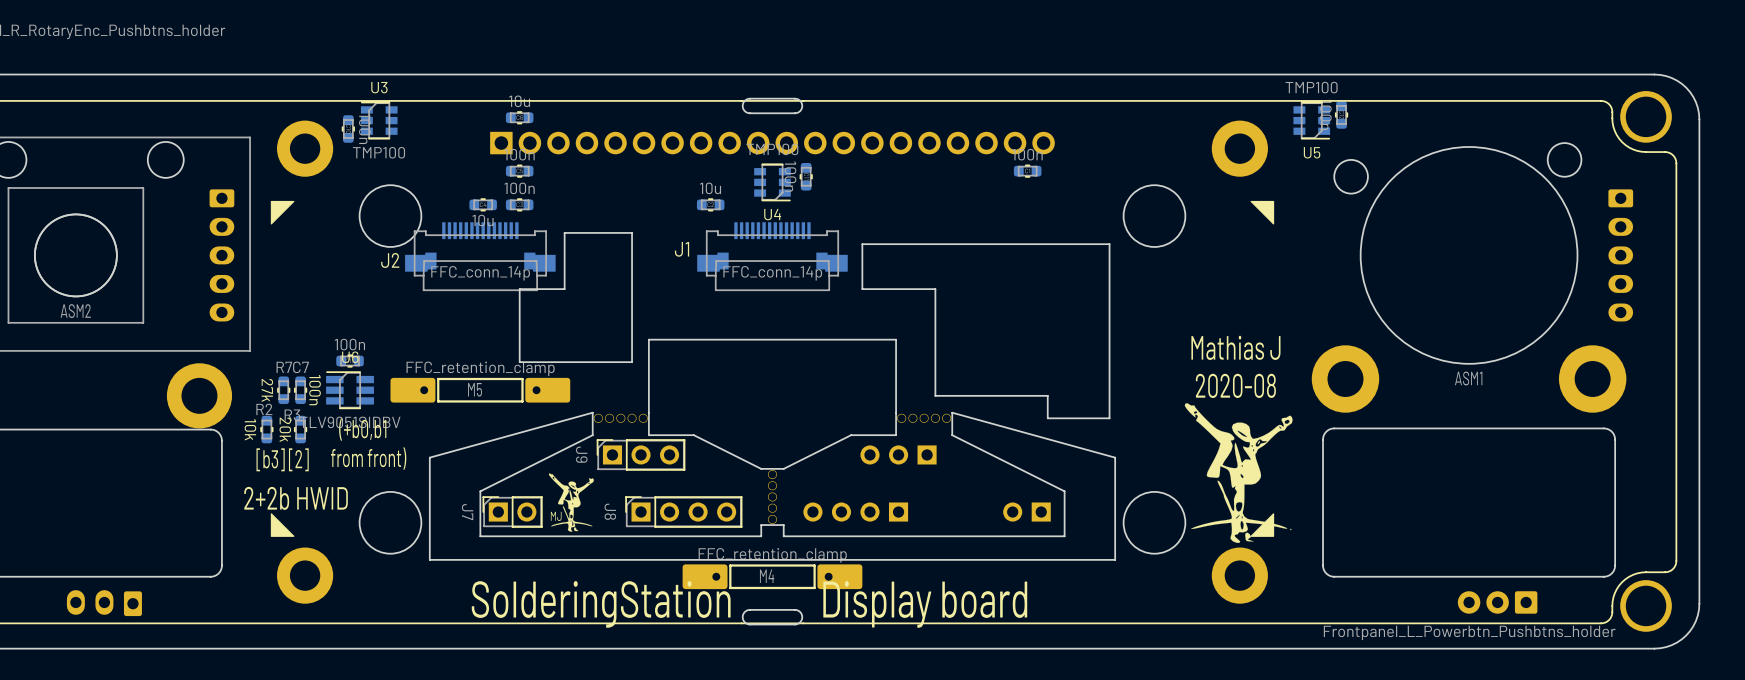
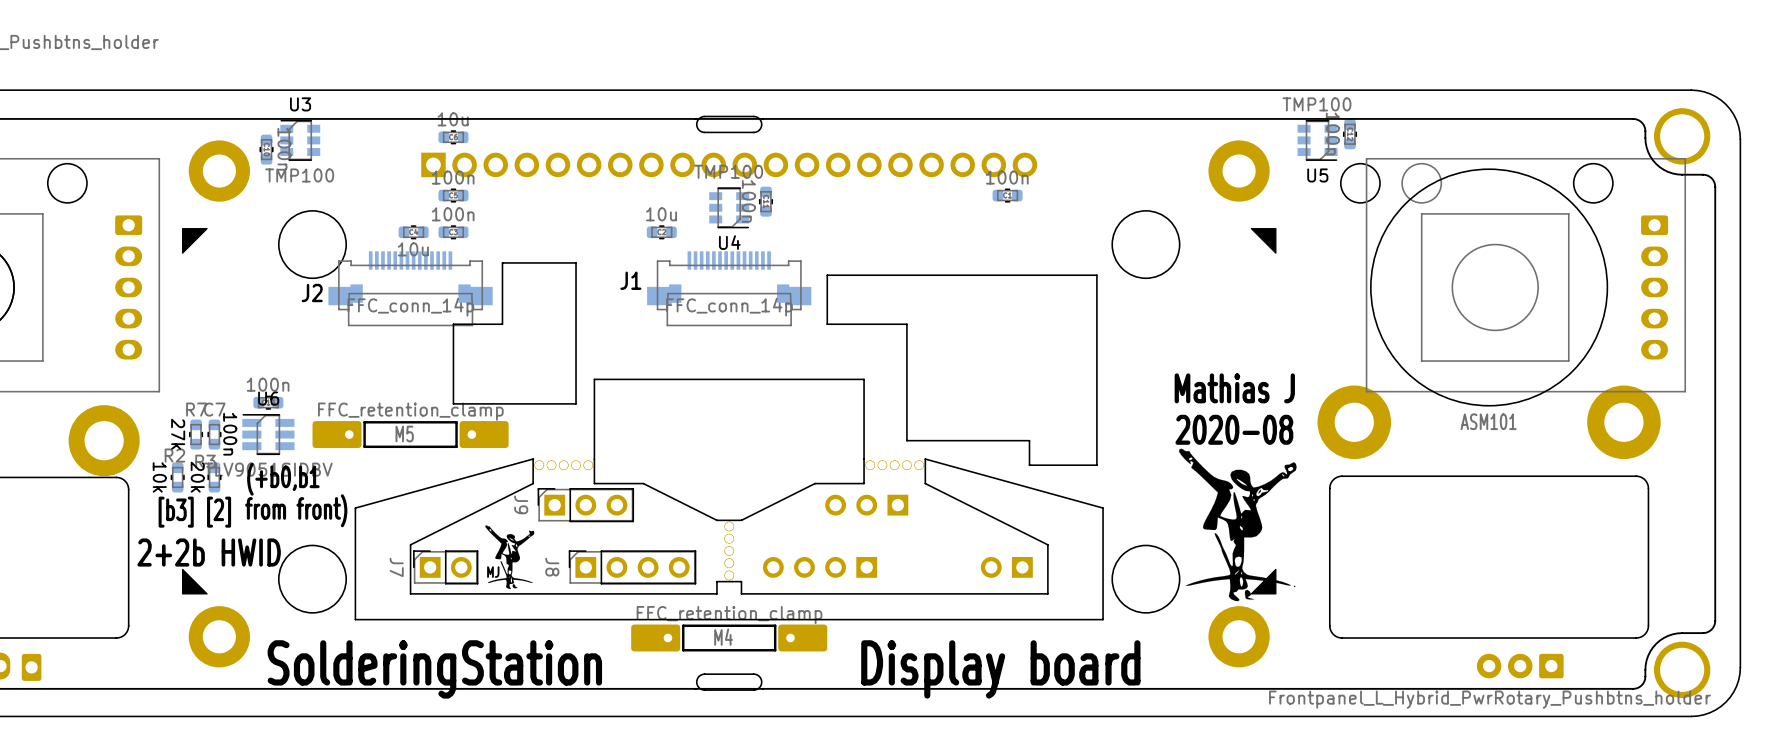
ASM101: none -> Frontpanel_L_Hybrid_PwrRotary_Pushbtns_holder (1501, 418)
ASM1: Frontpanel_L_Powerbtn_Pushbtns_holder (1472, 378) -> none

